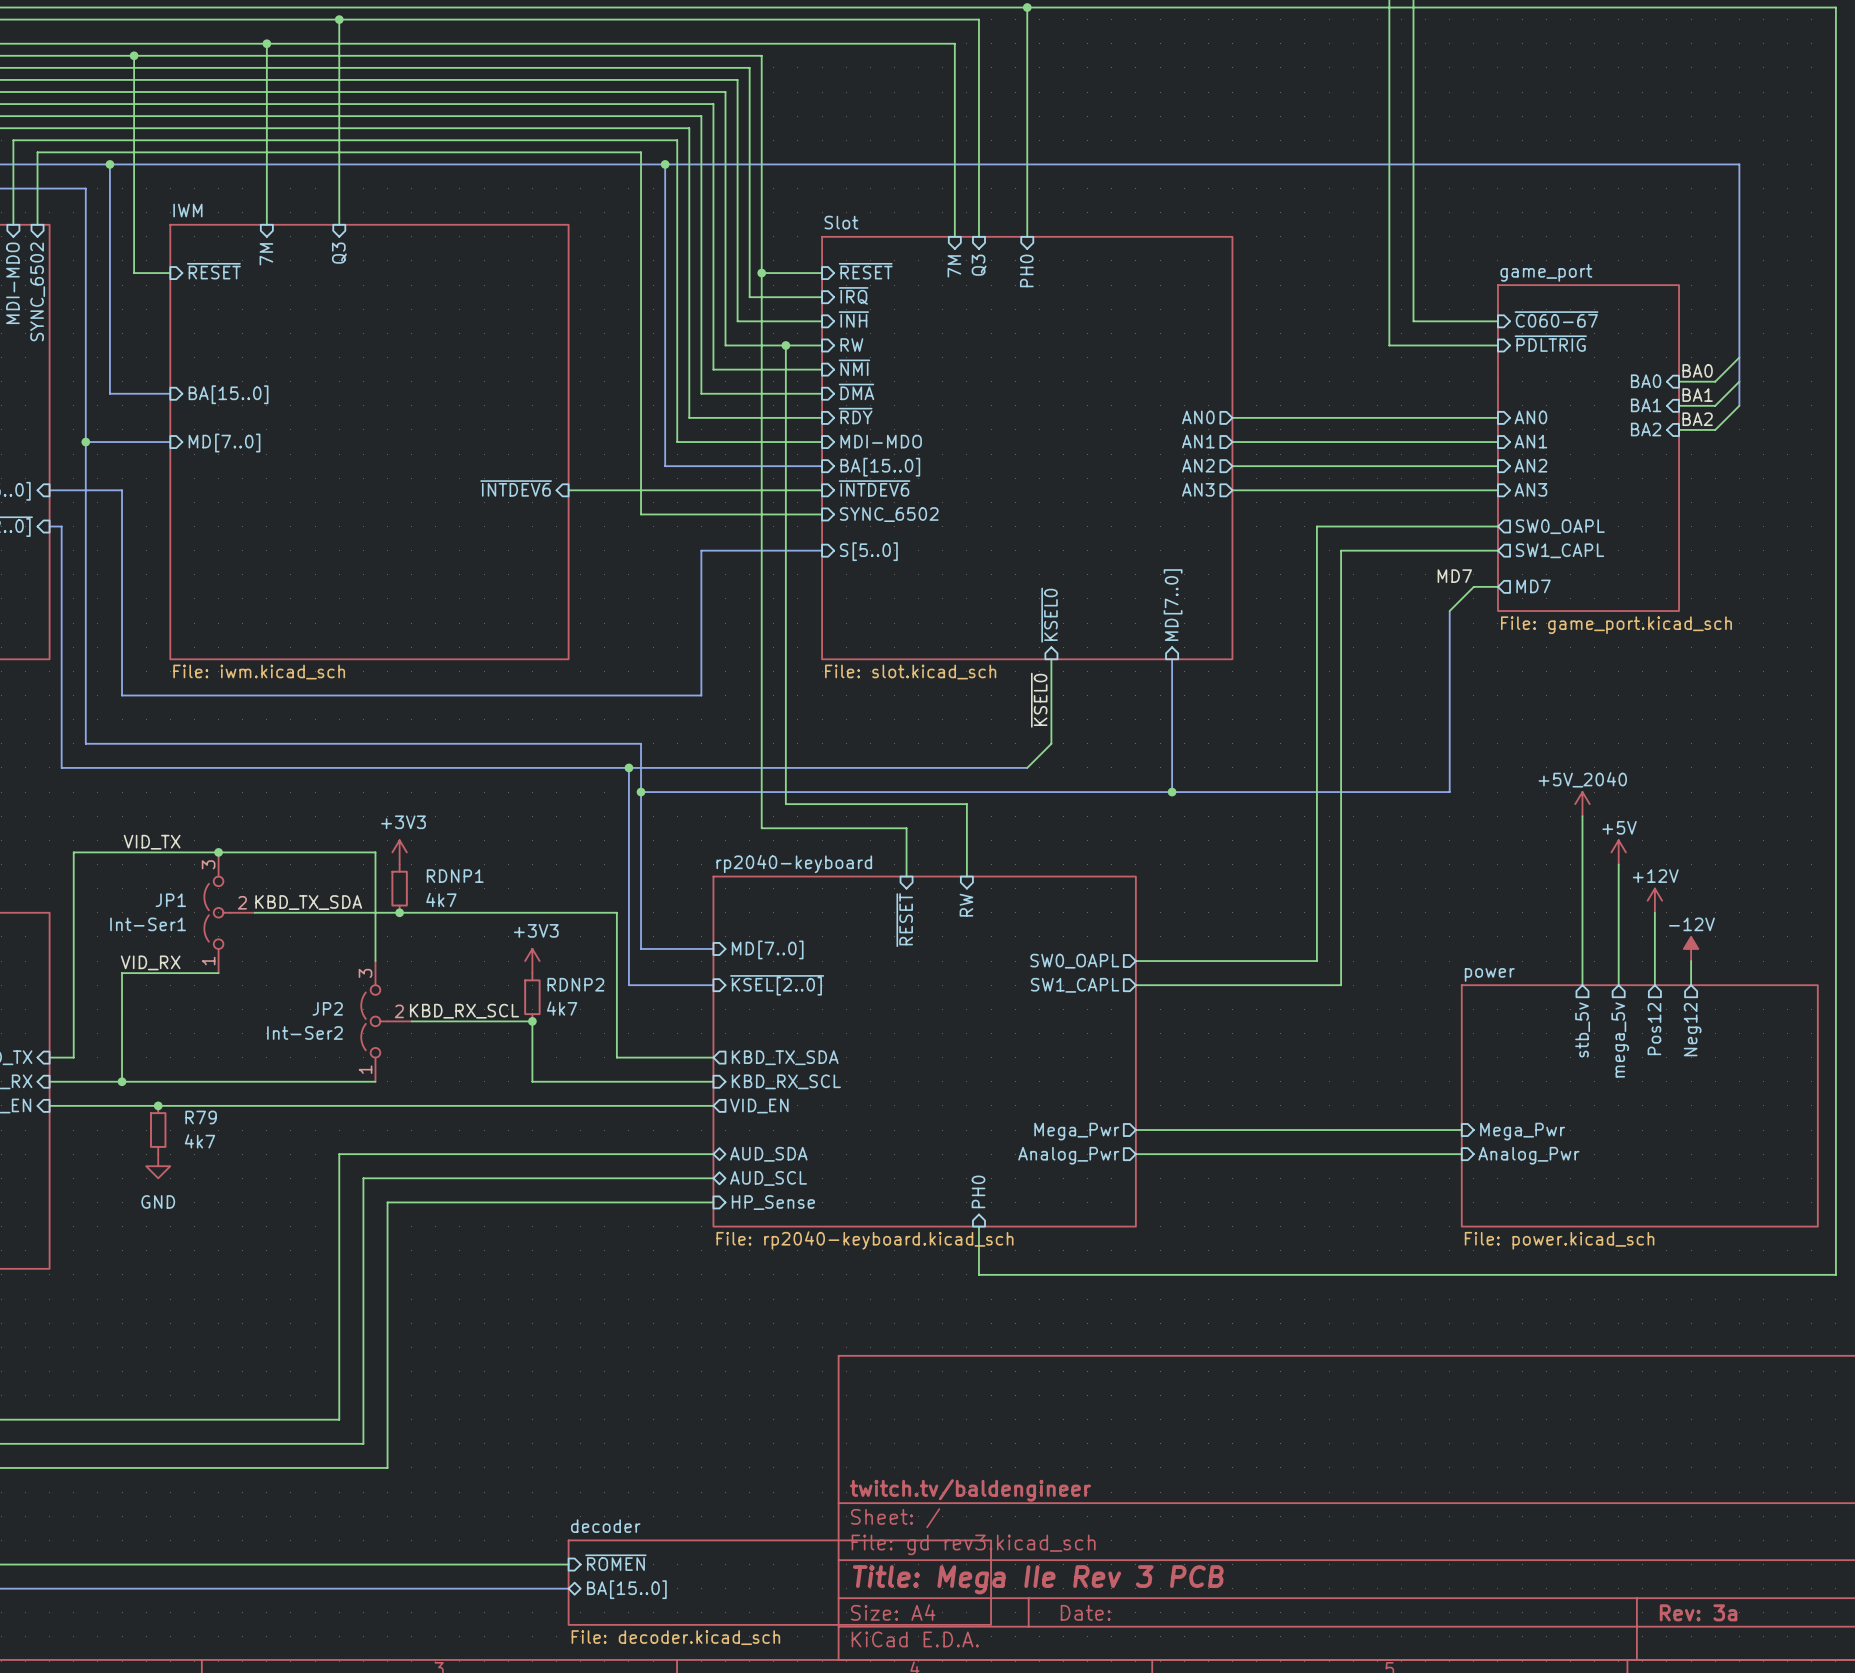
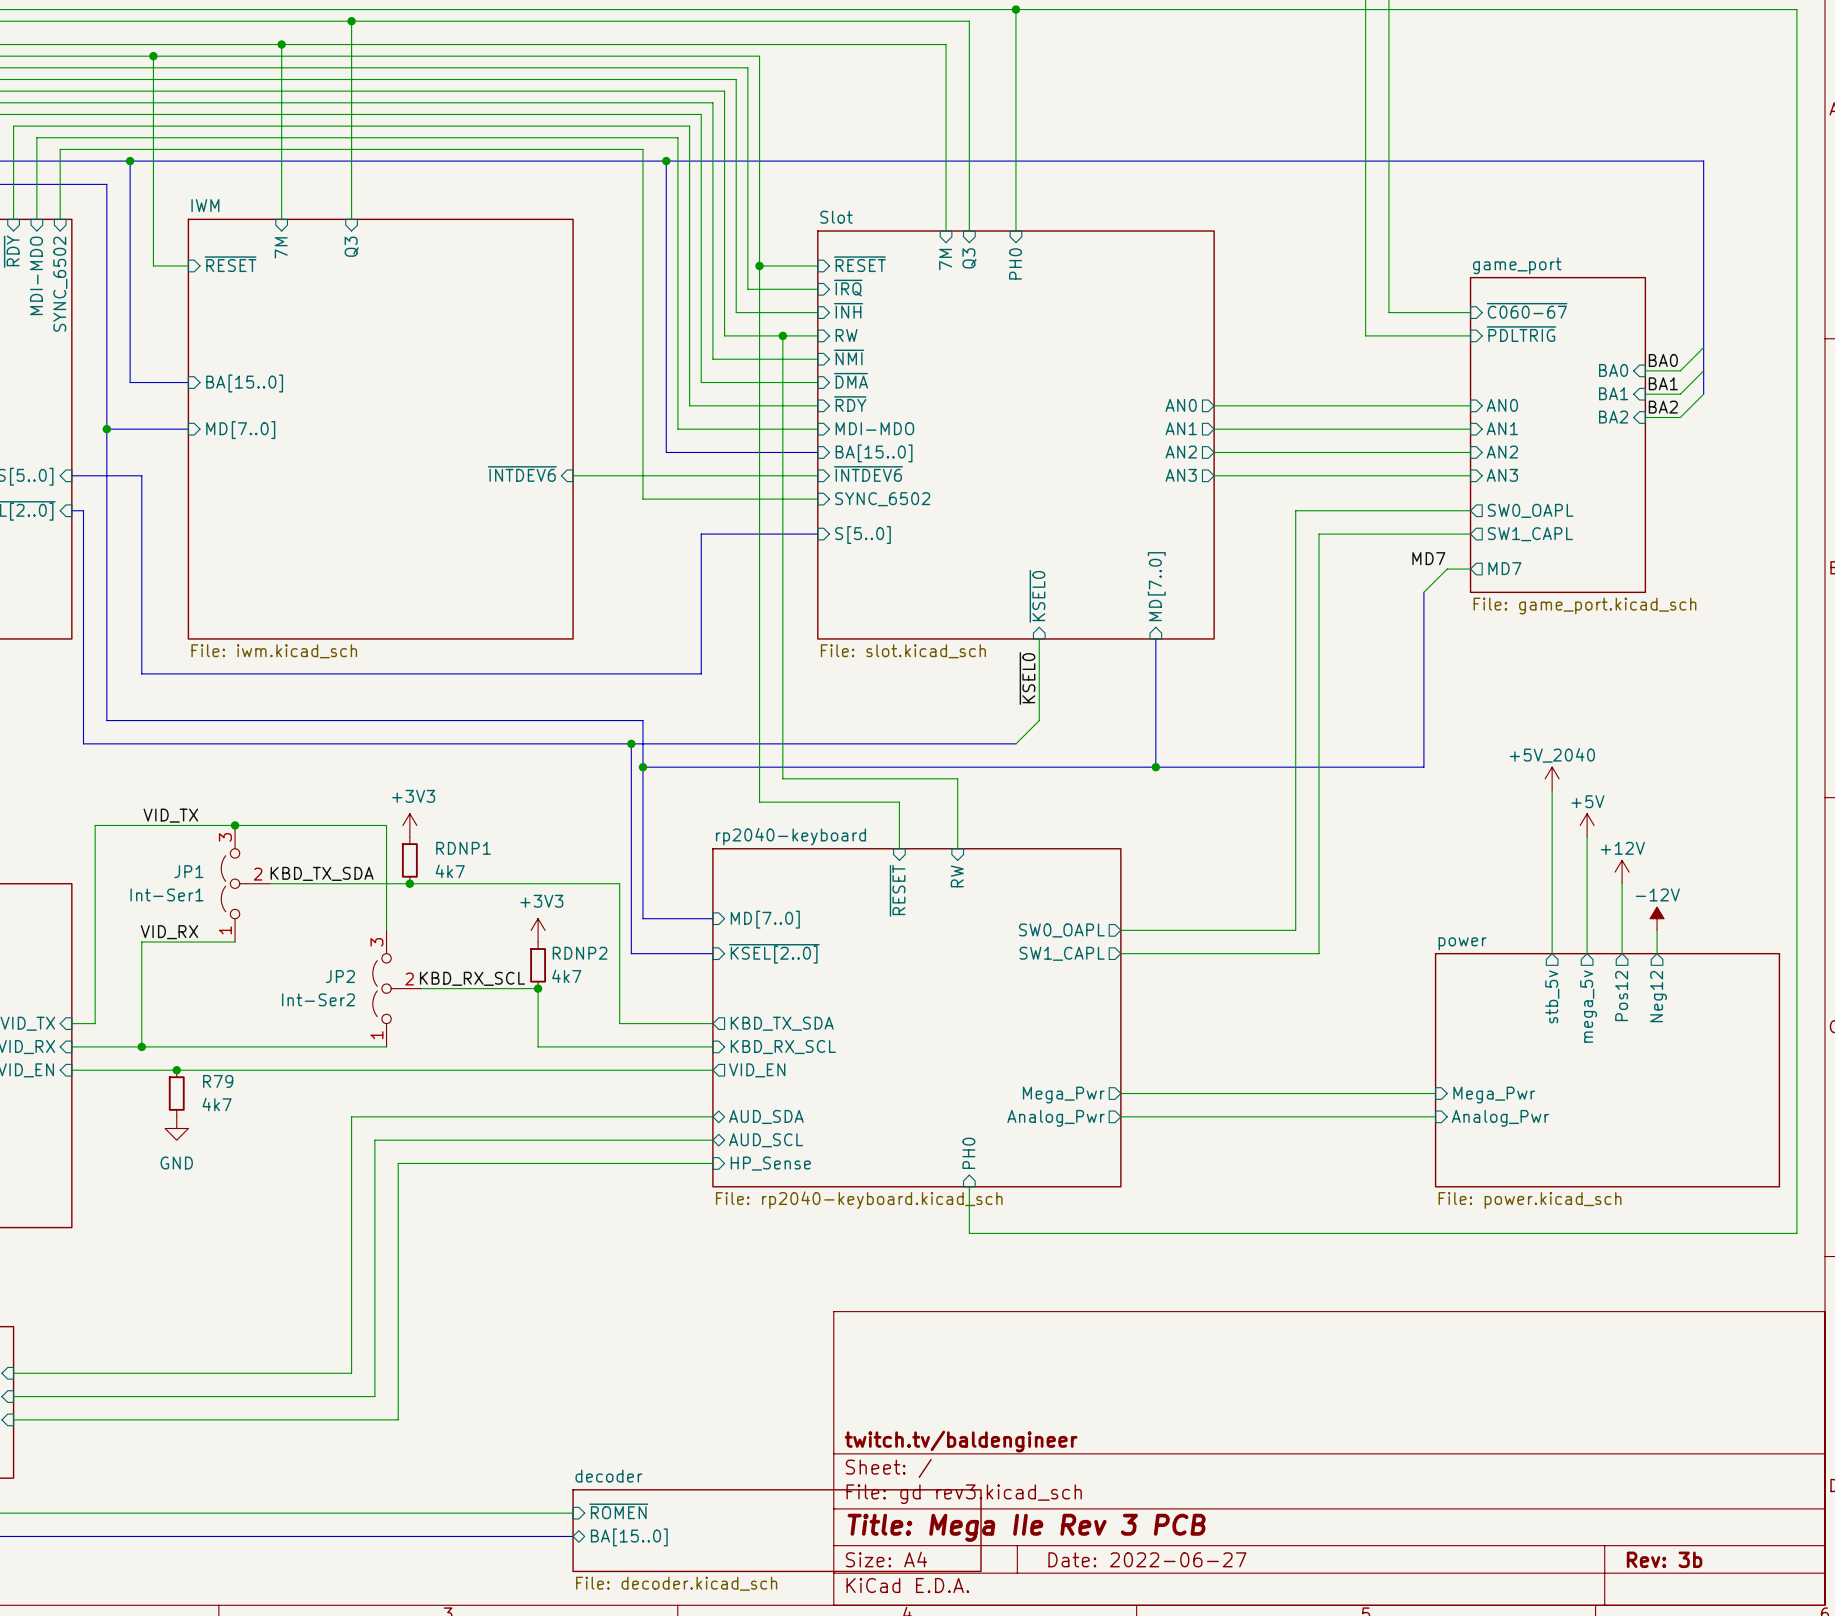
title block: Date: (1085, 1612) -> Date: 2022-06-27 (1147, 1559)
title block: Rev: 3a (1698, 1612) -> Rev: 3b (1664, 1559)

